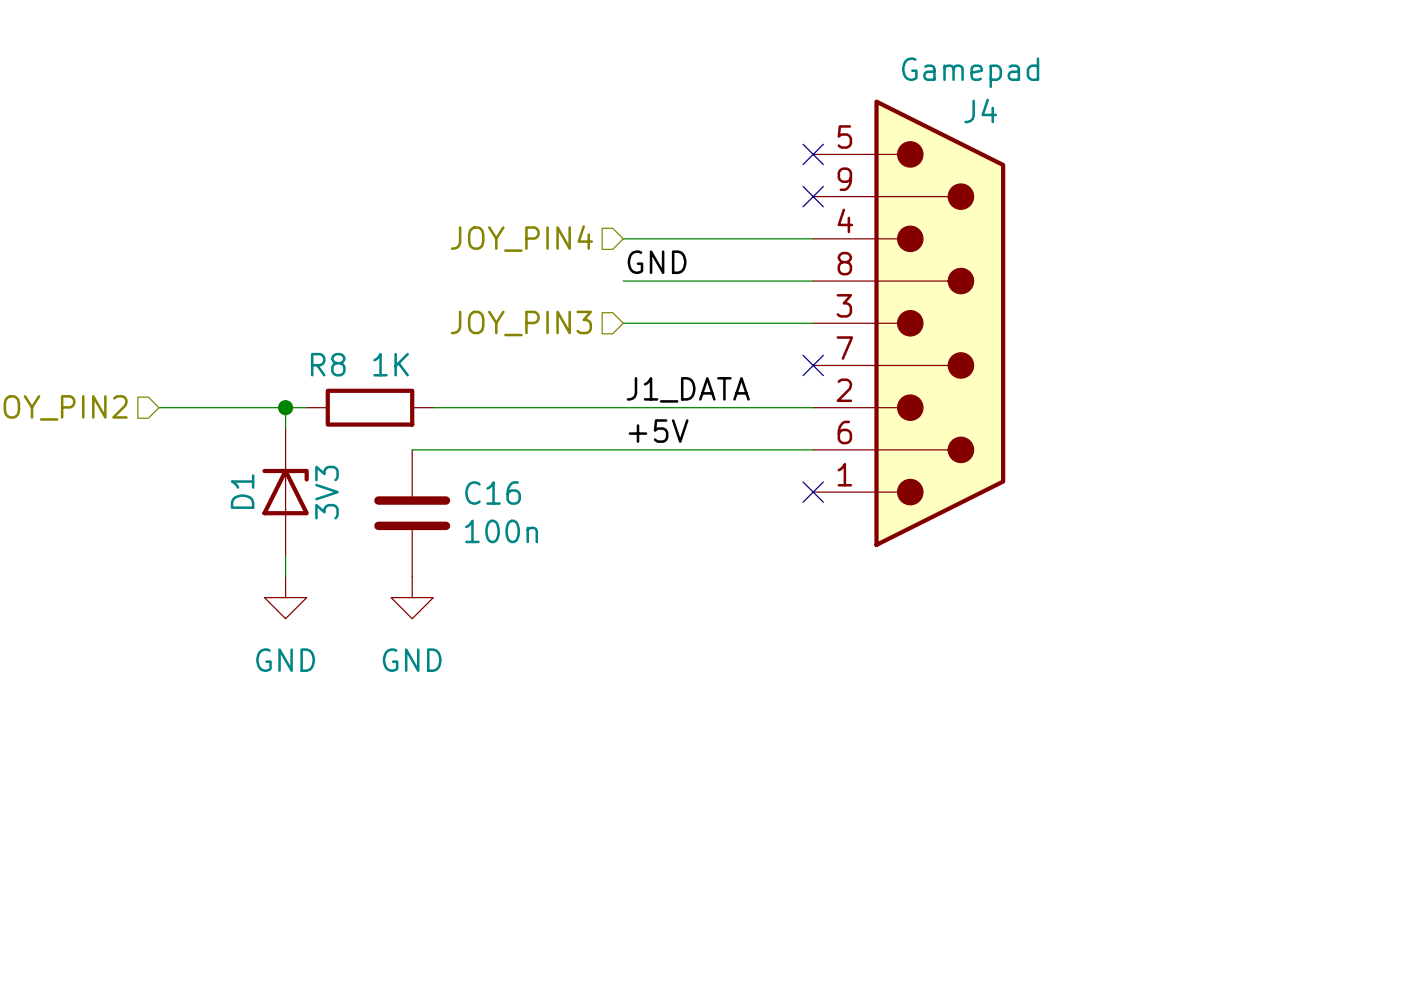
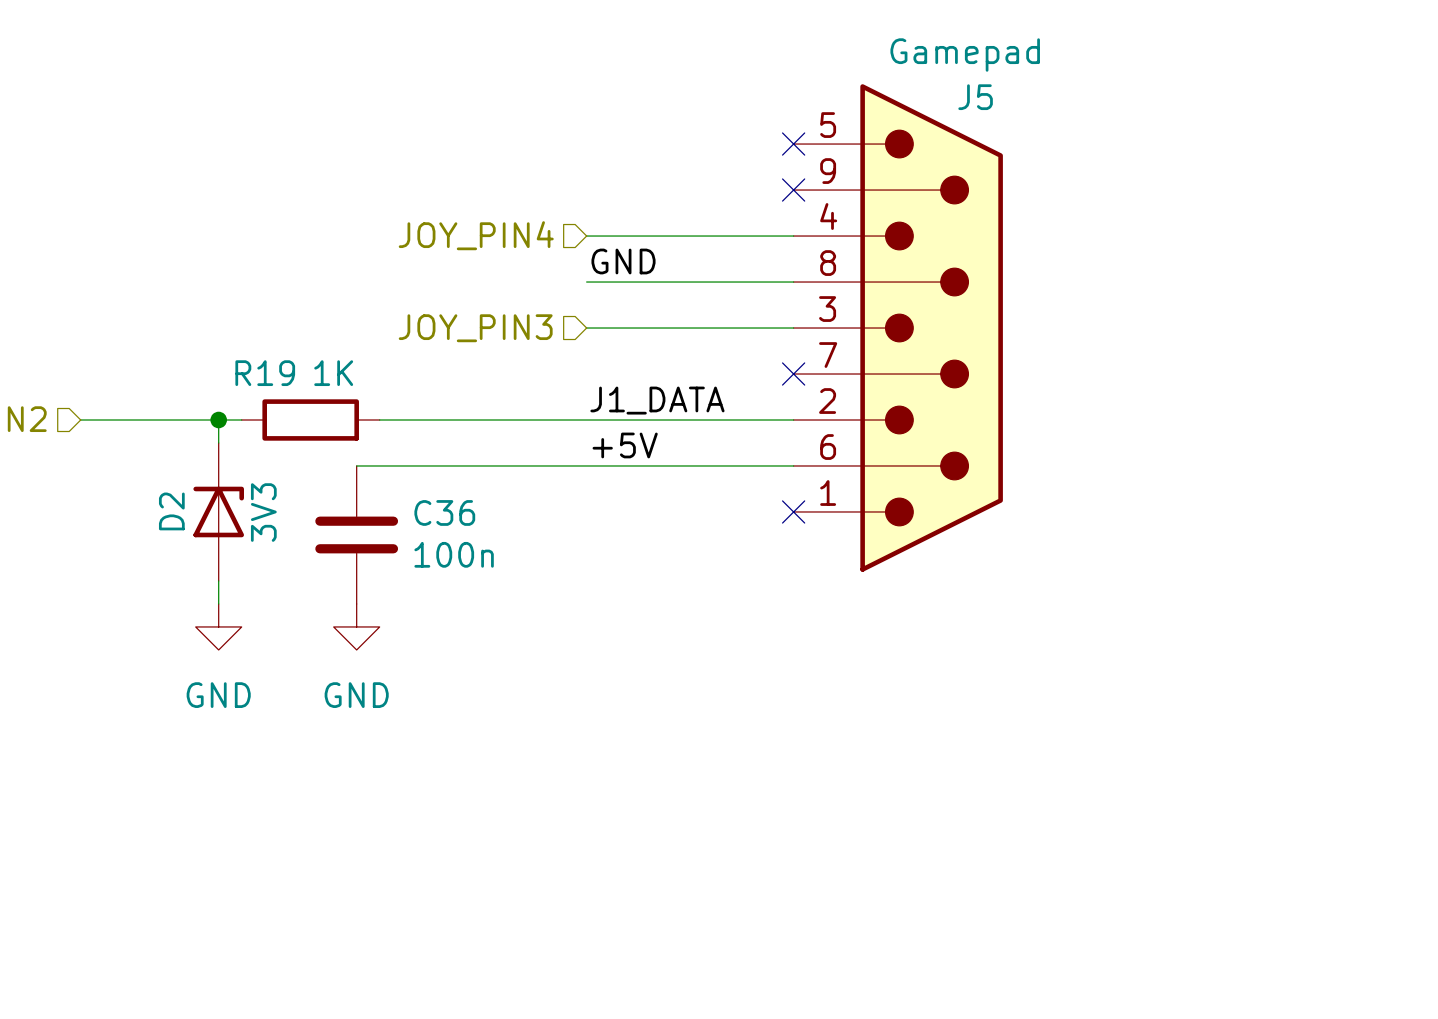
J4 name: J4 (980, 110) -> J5 (975, 97)
R8 name: R8 (328, 364) -> R19 (265, 373)
D1 name: D1 (242, 491) -> D2 (171, 511)
C16 name: C16 (493, 493) -> C36 (444, 512)

